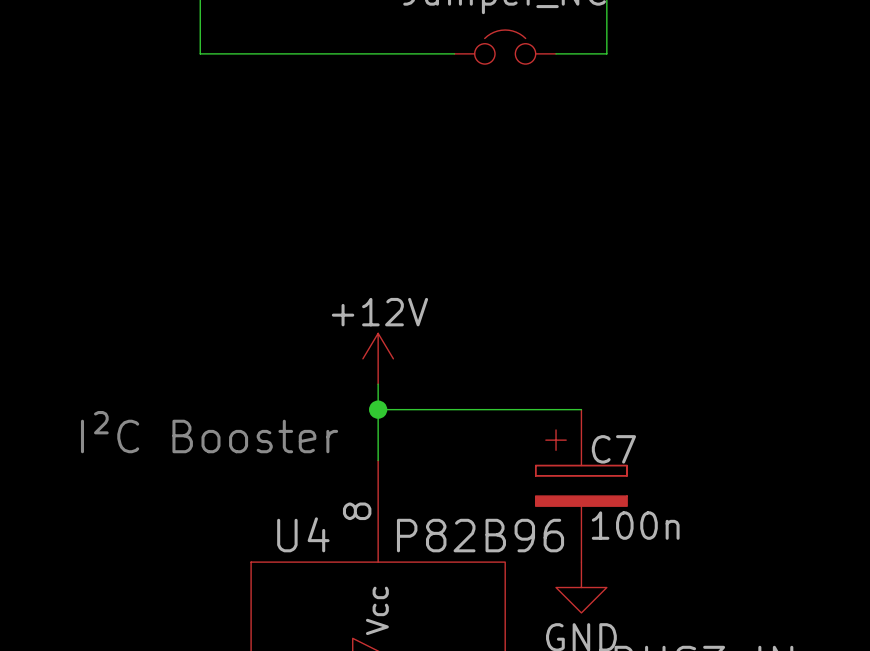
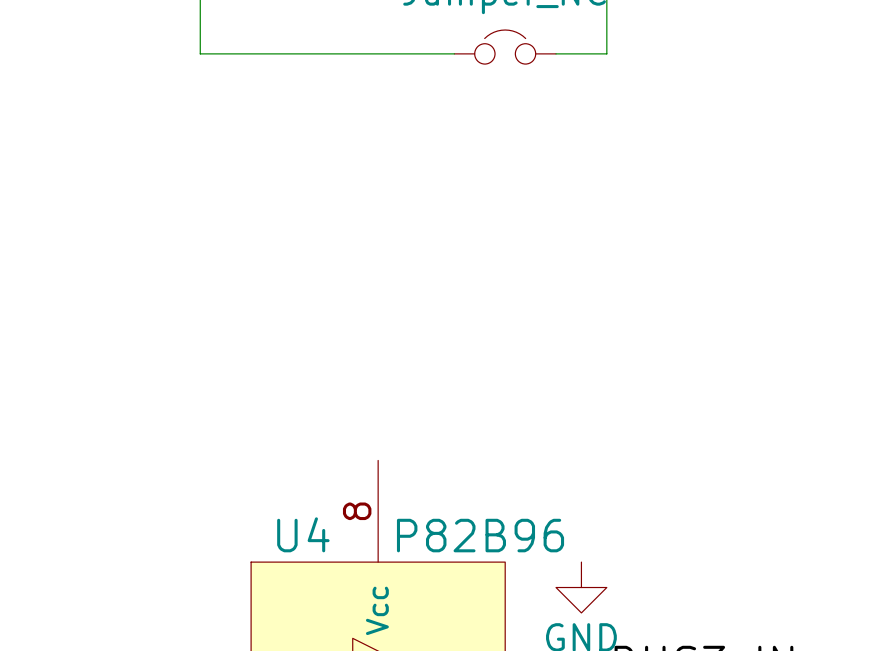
power symbol: +12V (378, 358) -> none
wire: (378, 384) (378, 460) -> none
wire: (378, 409) (581, 409) -> none
junction: (378, 409) -> none
text: I²C Booster (209, 432) -> none
C7: 100n (581, 485) -> none

